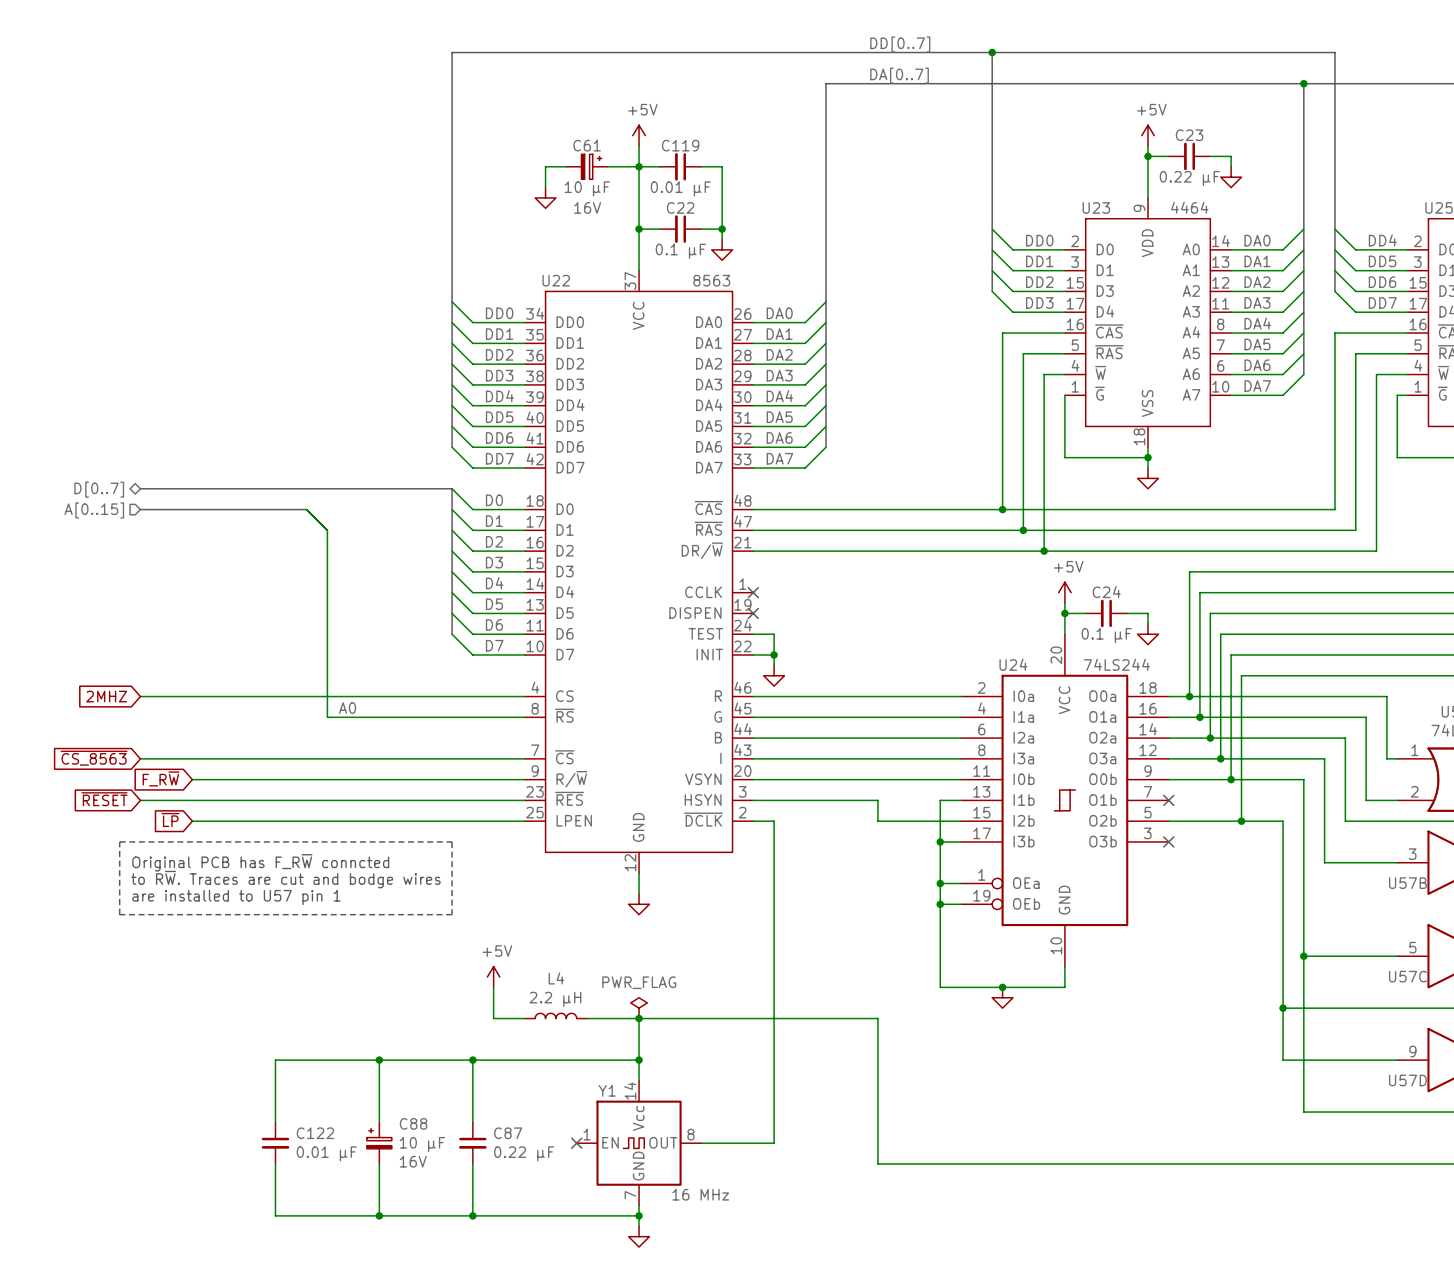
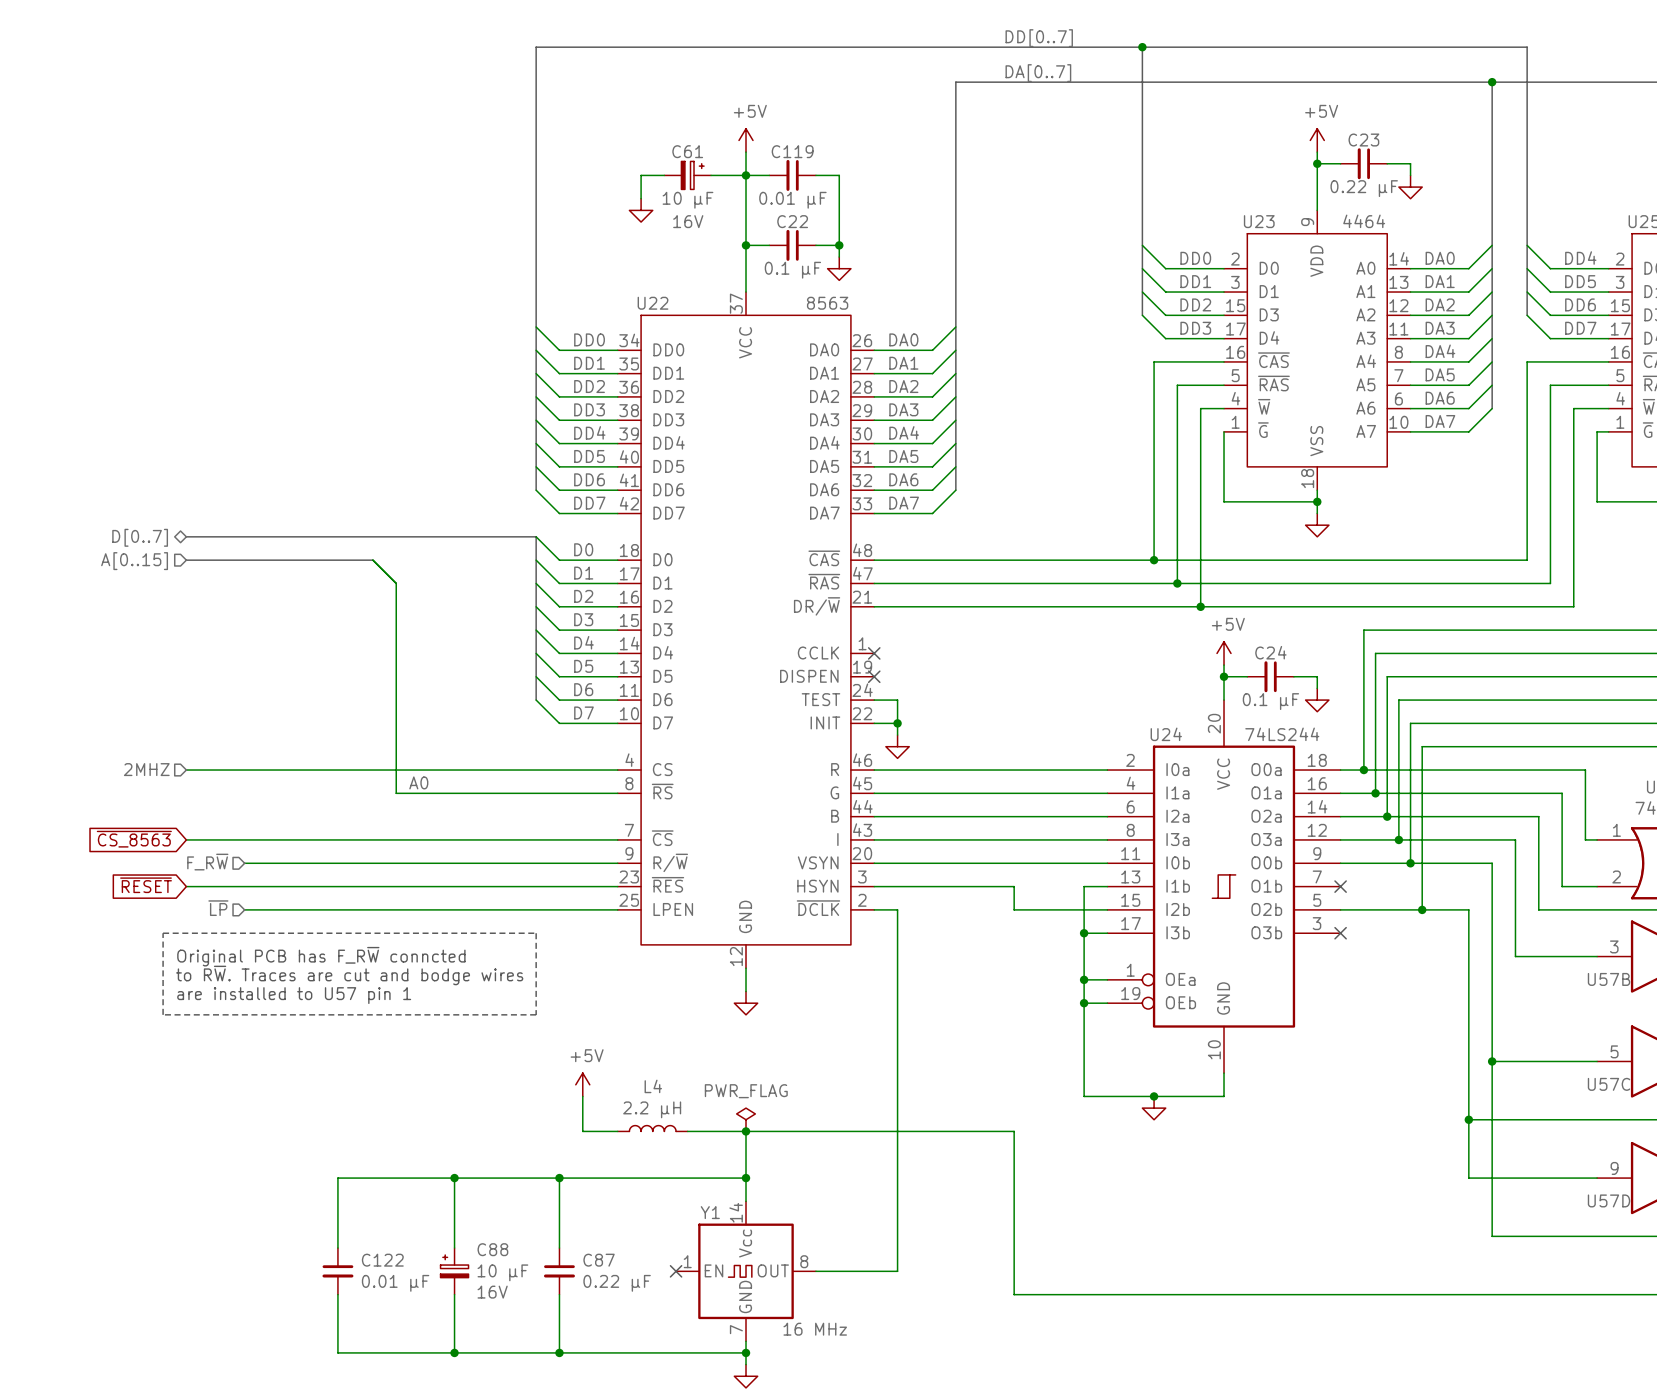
hierarchical label: none -> 2MHZ (146, 769)
global label: 2MHZ (106, 696) -> none
hierarchical label: none -> F_R~{W} (207, 862)
global label: F_R~{W} (161, 778) -> none
hierarchical label: none -> ~{LP} (218, 908)
global label: ~{LP} (170, 819) -> none

